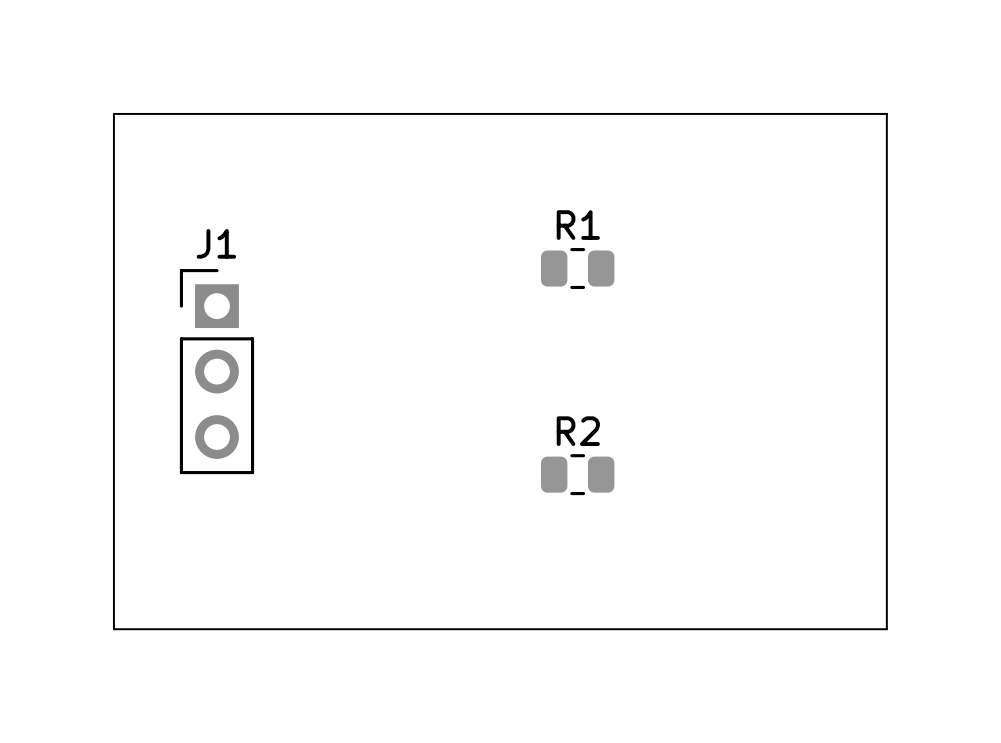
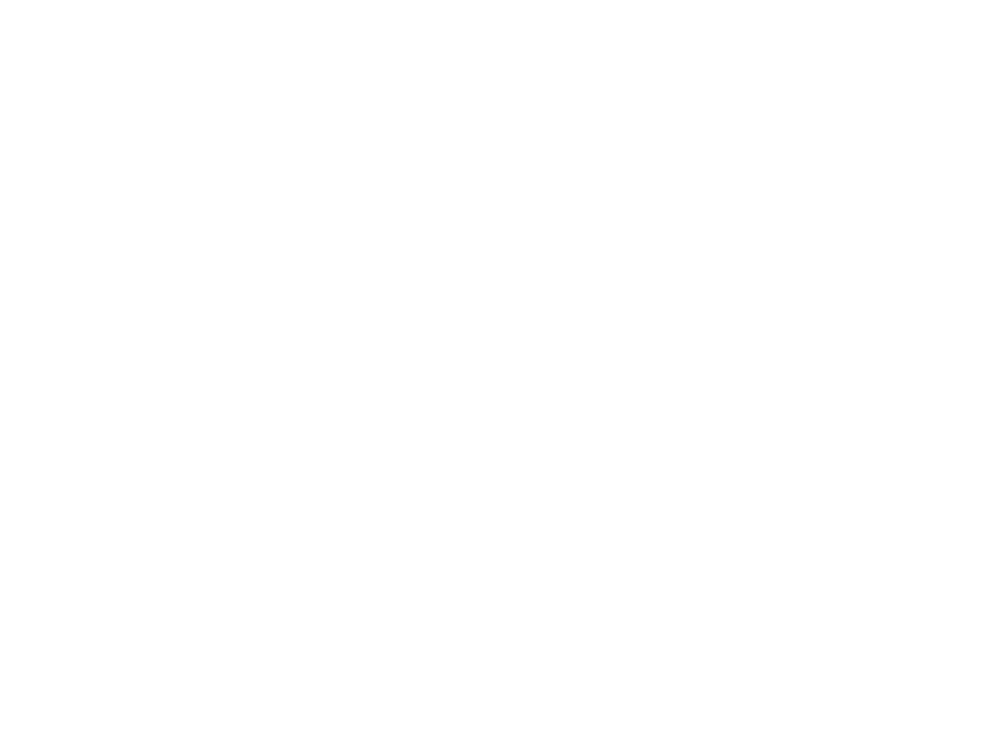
board edge: (113, 113) (886, 113) (886, 629) (113, 629) (113, 113) -> none
R1: (577, 268) -> none
J1: (216, 371) -> none
R2: (577, 474) -> none

